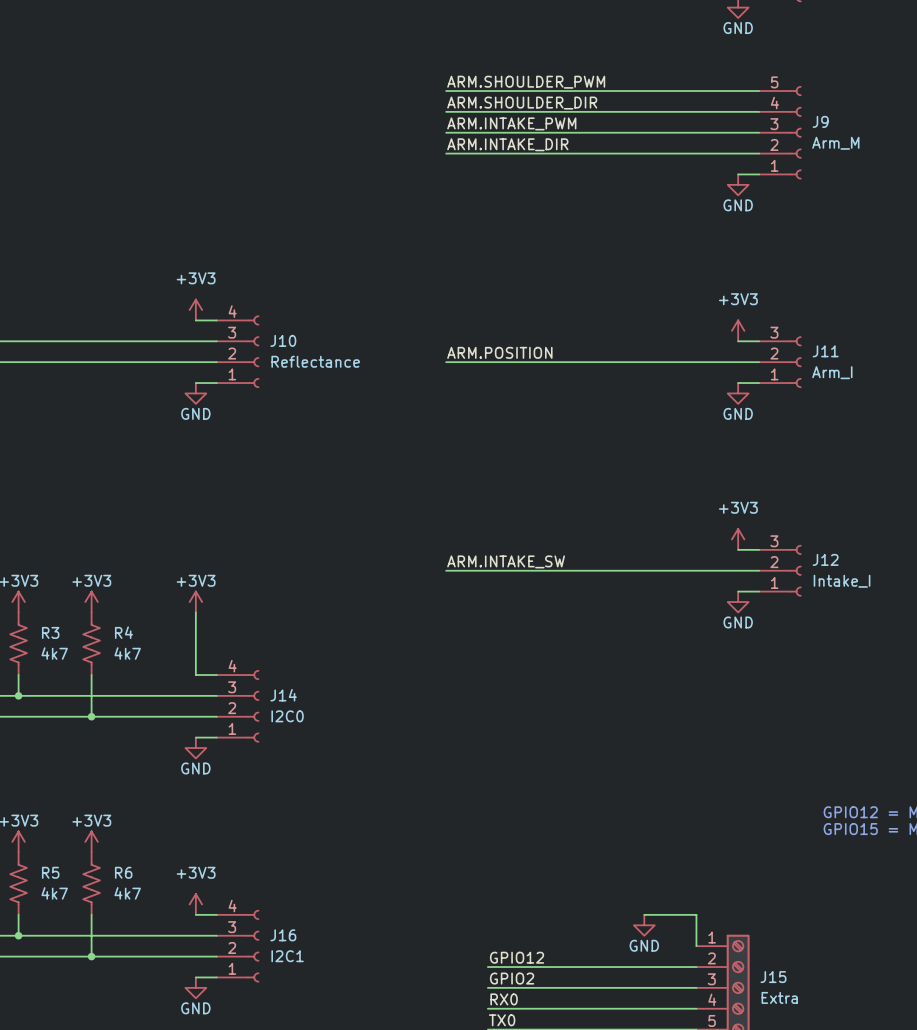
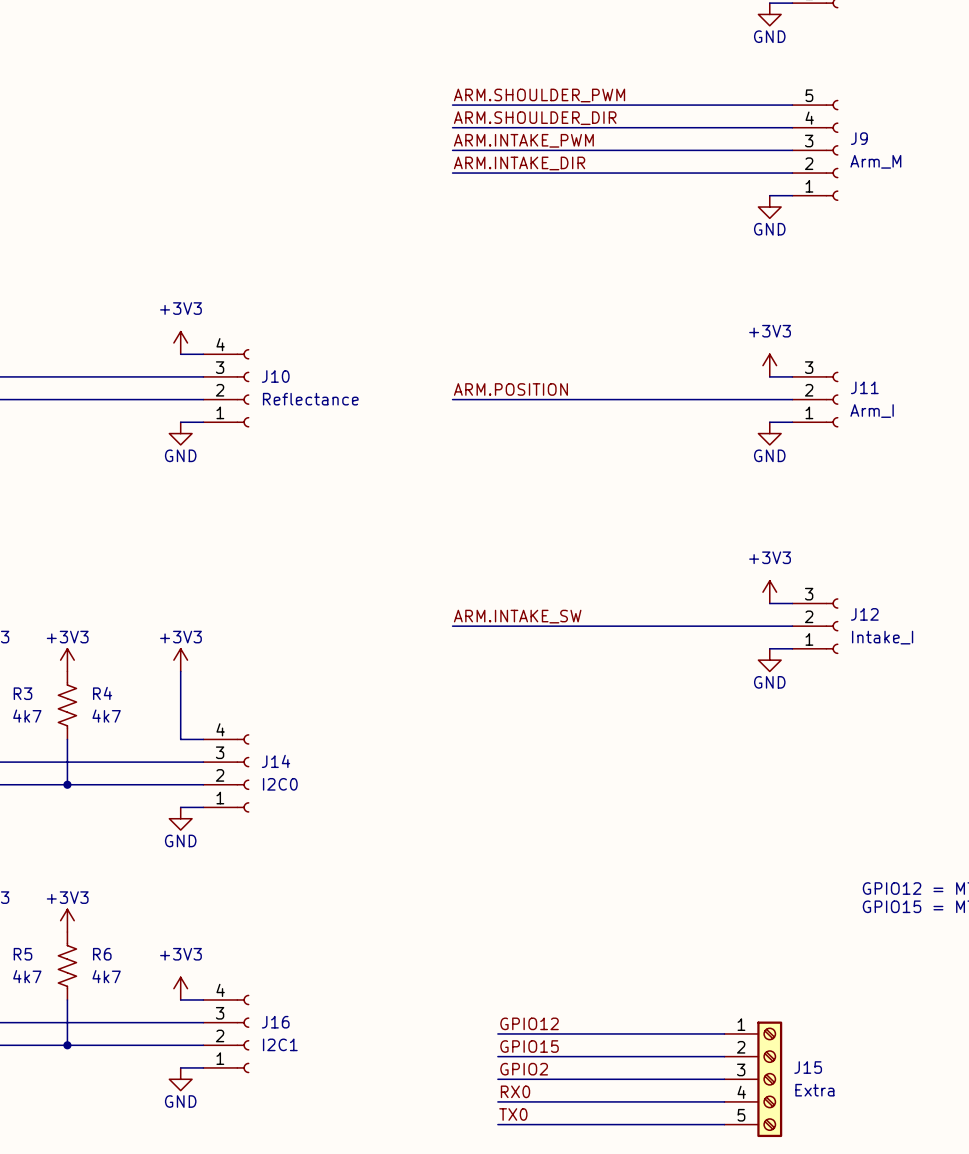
wire: (644, 914) (696, 914) (696, 946) -> (497, 1033) (724, 1033)
power symbol: GND (644, 925) -> none
label: none -> GPIO12 (529, 1023)
label: GPIO12 (517, 957) -> GPIO15 (529, 1046)

